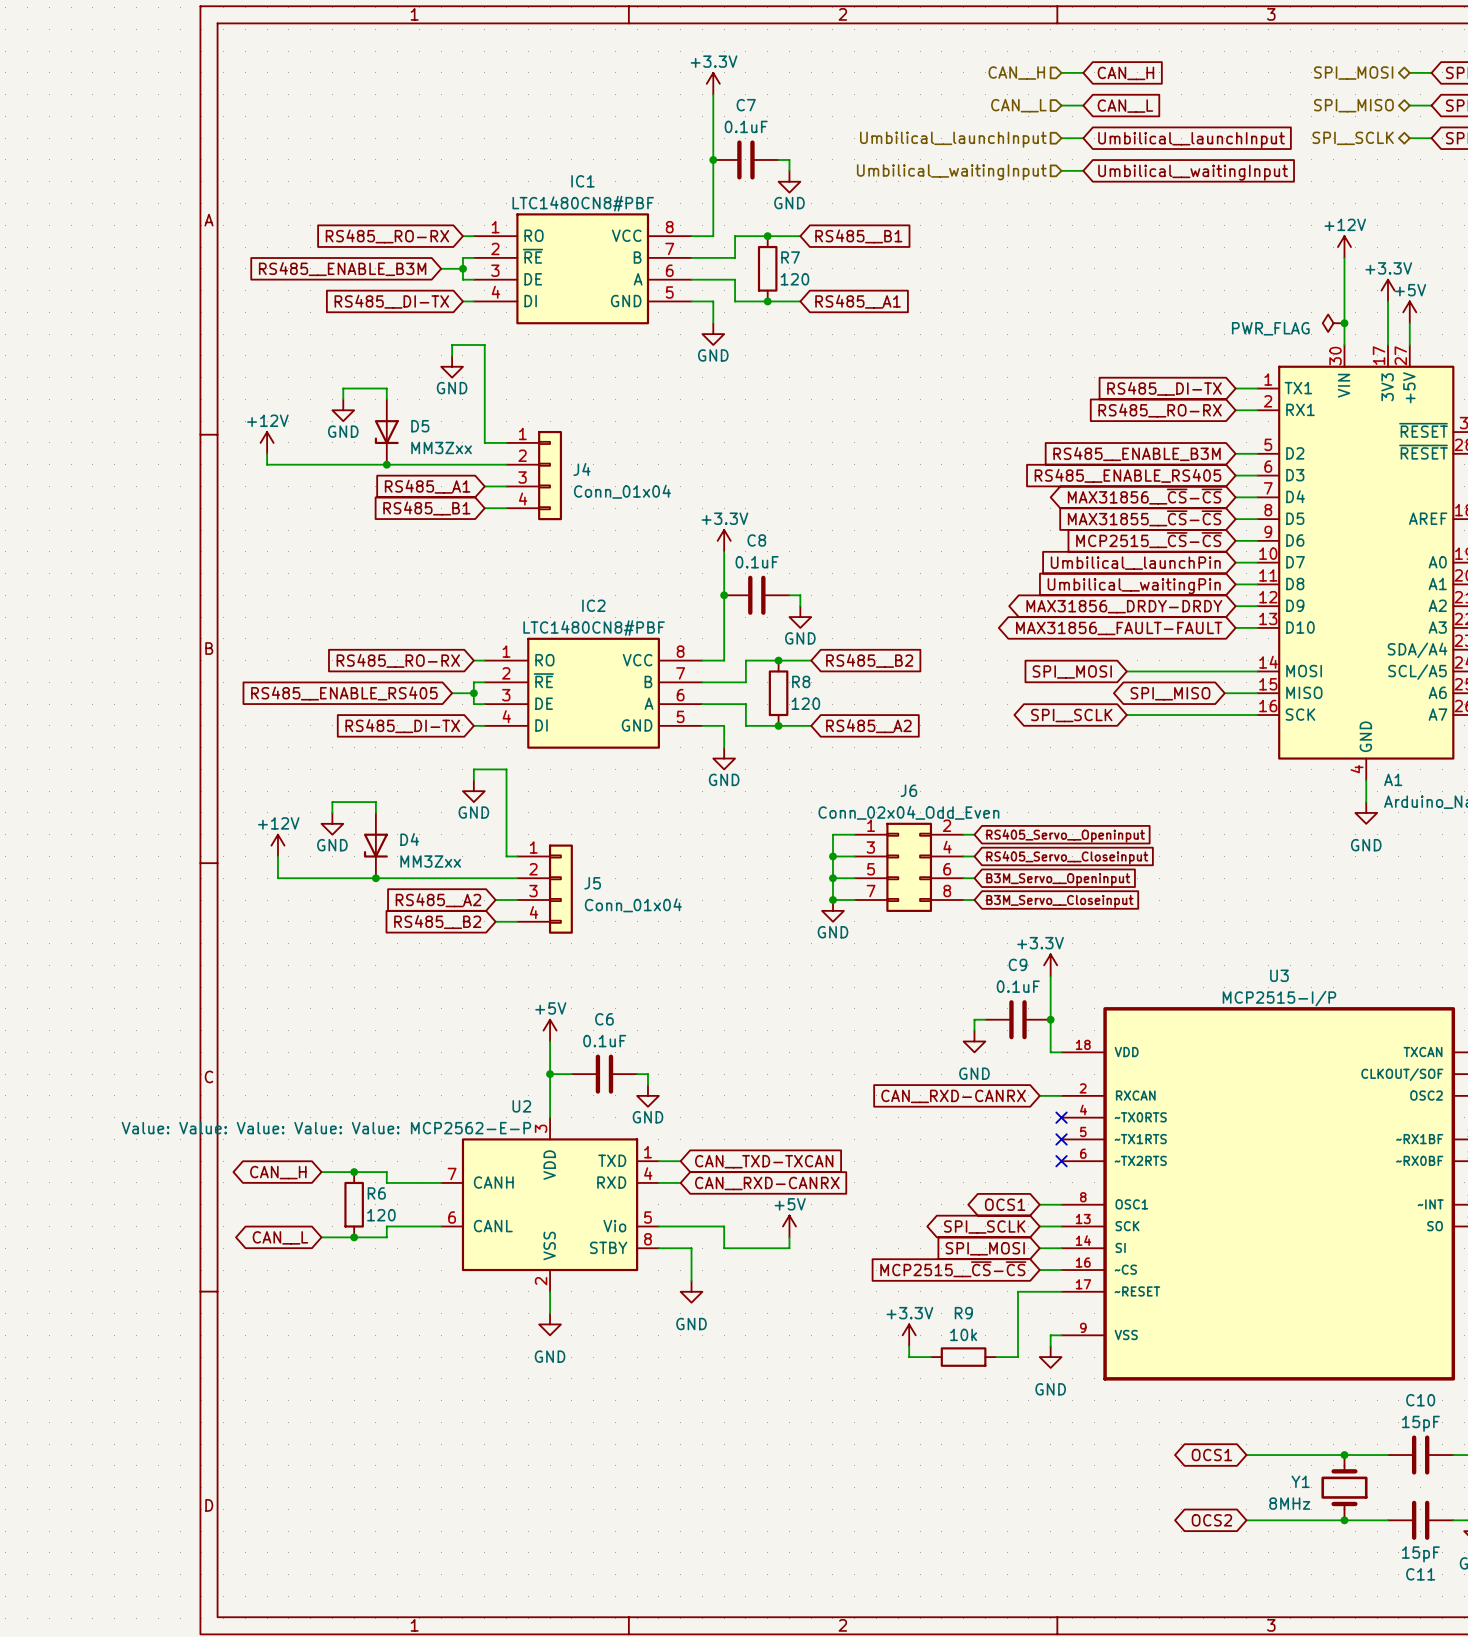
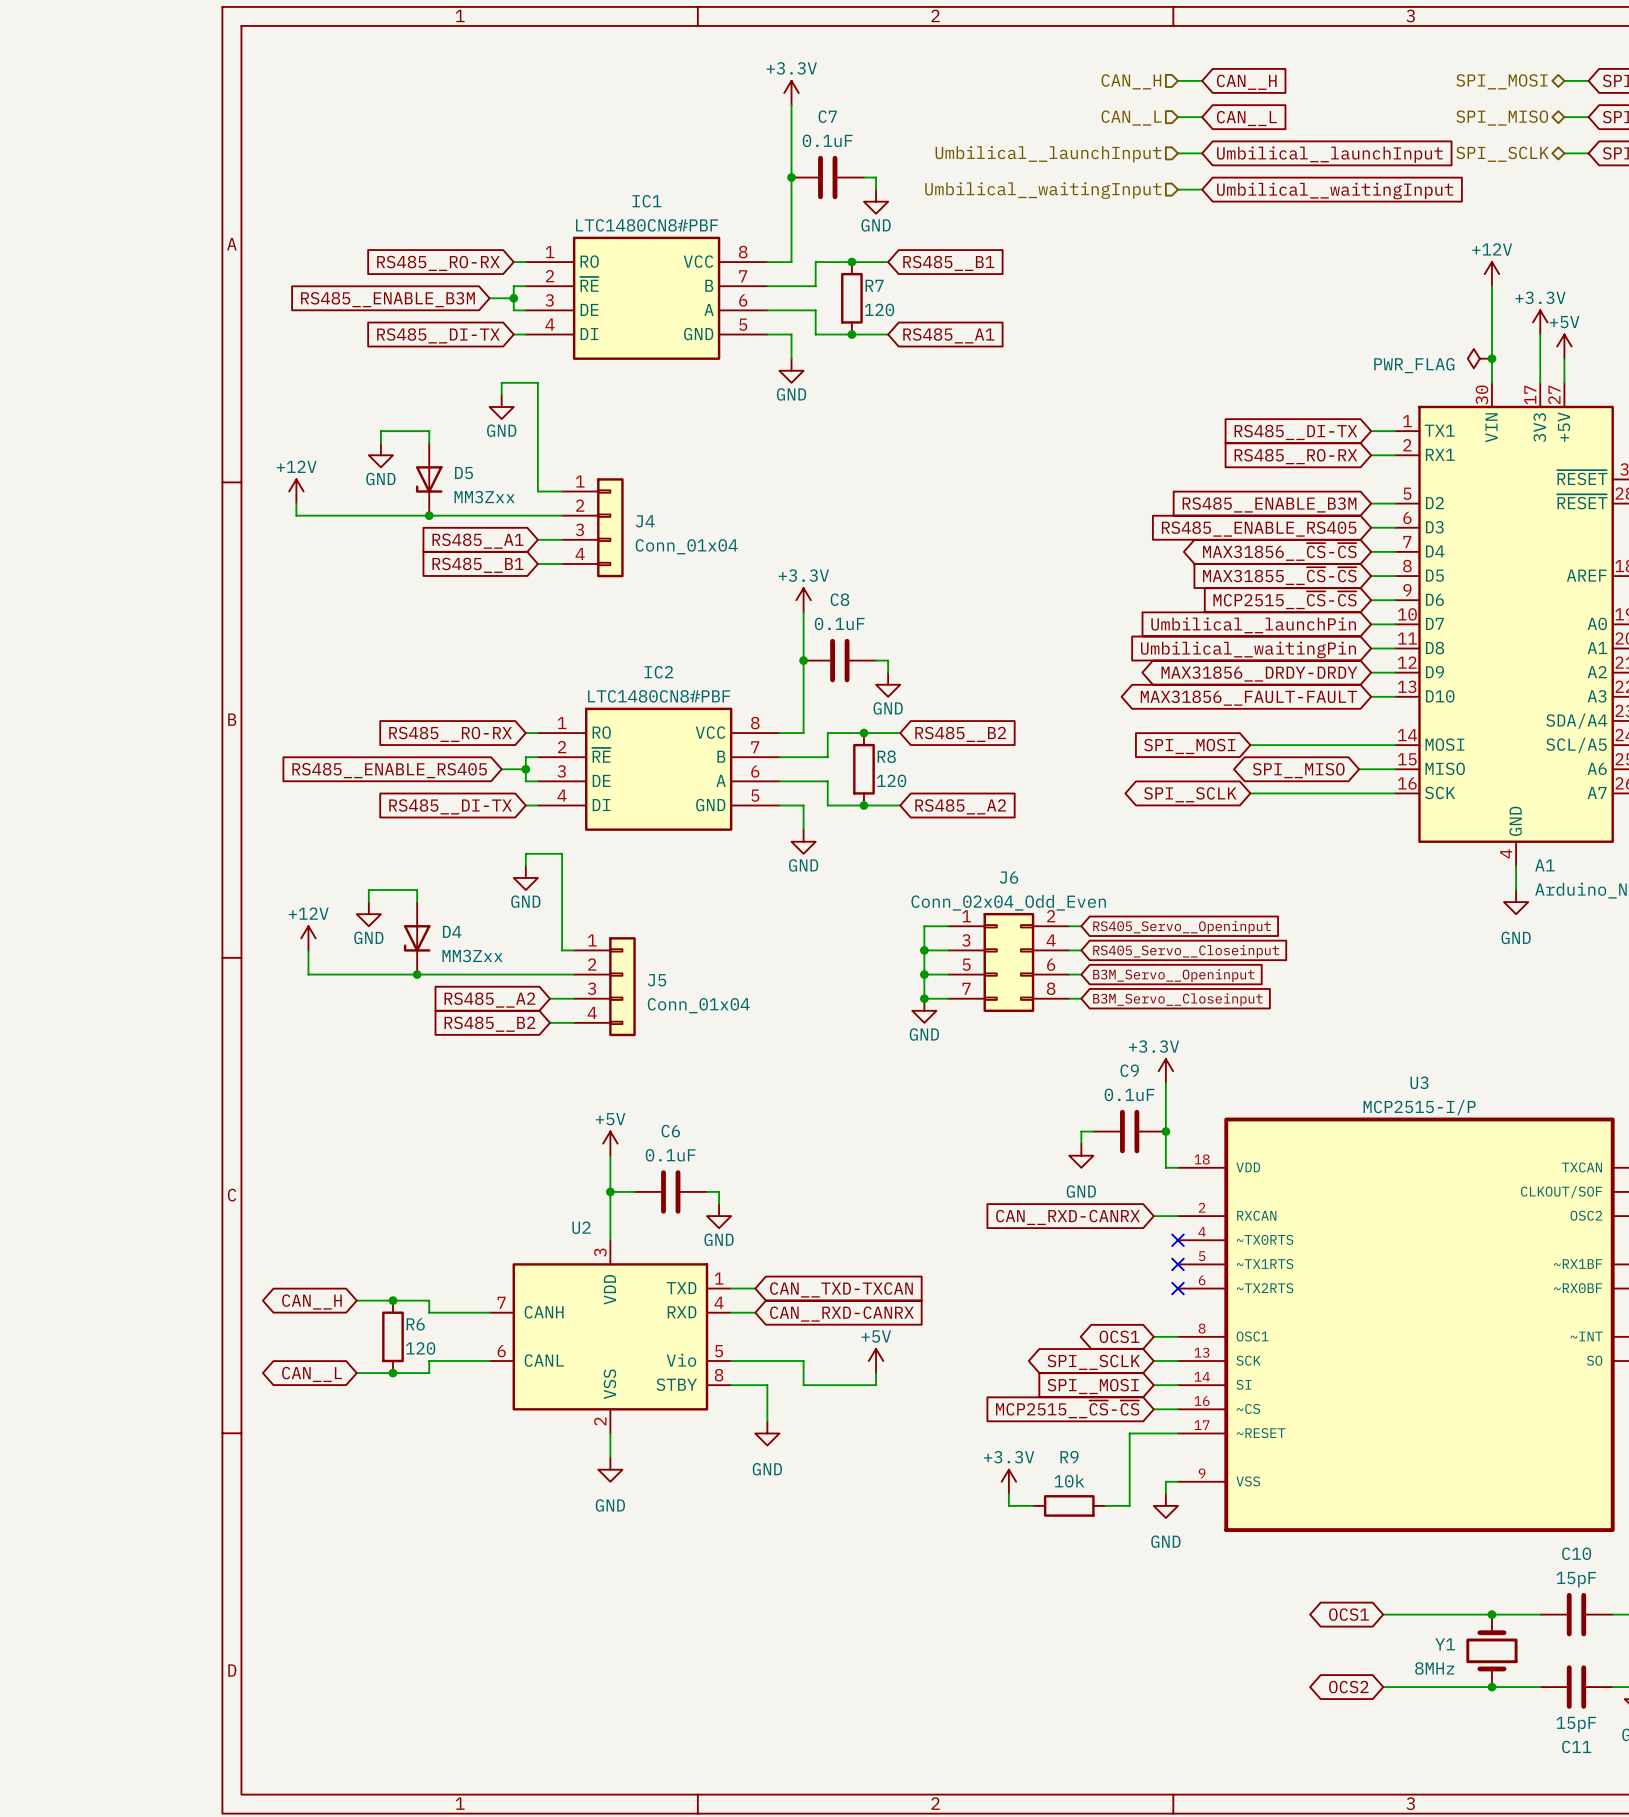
U2 value: Value: Value: Value: Value: Value: MCP2562-E-P (326, 1128) -> none

